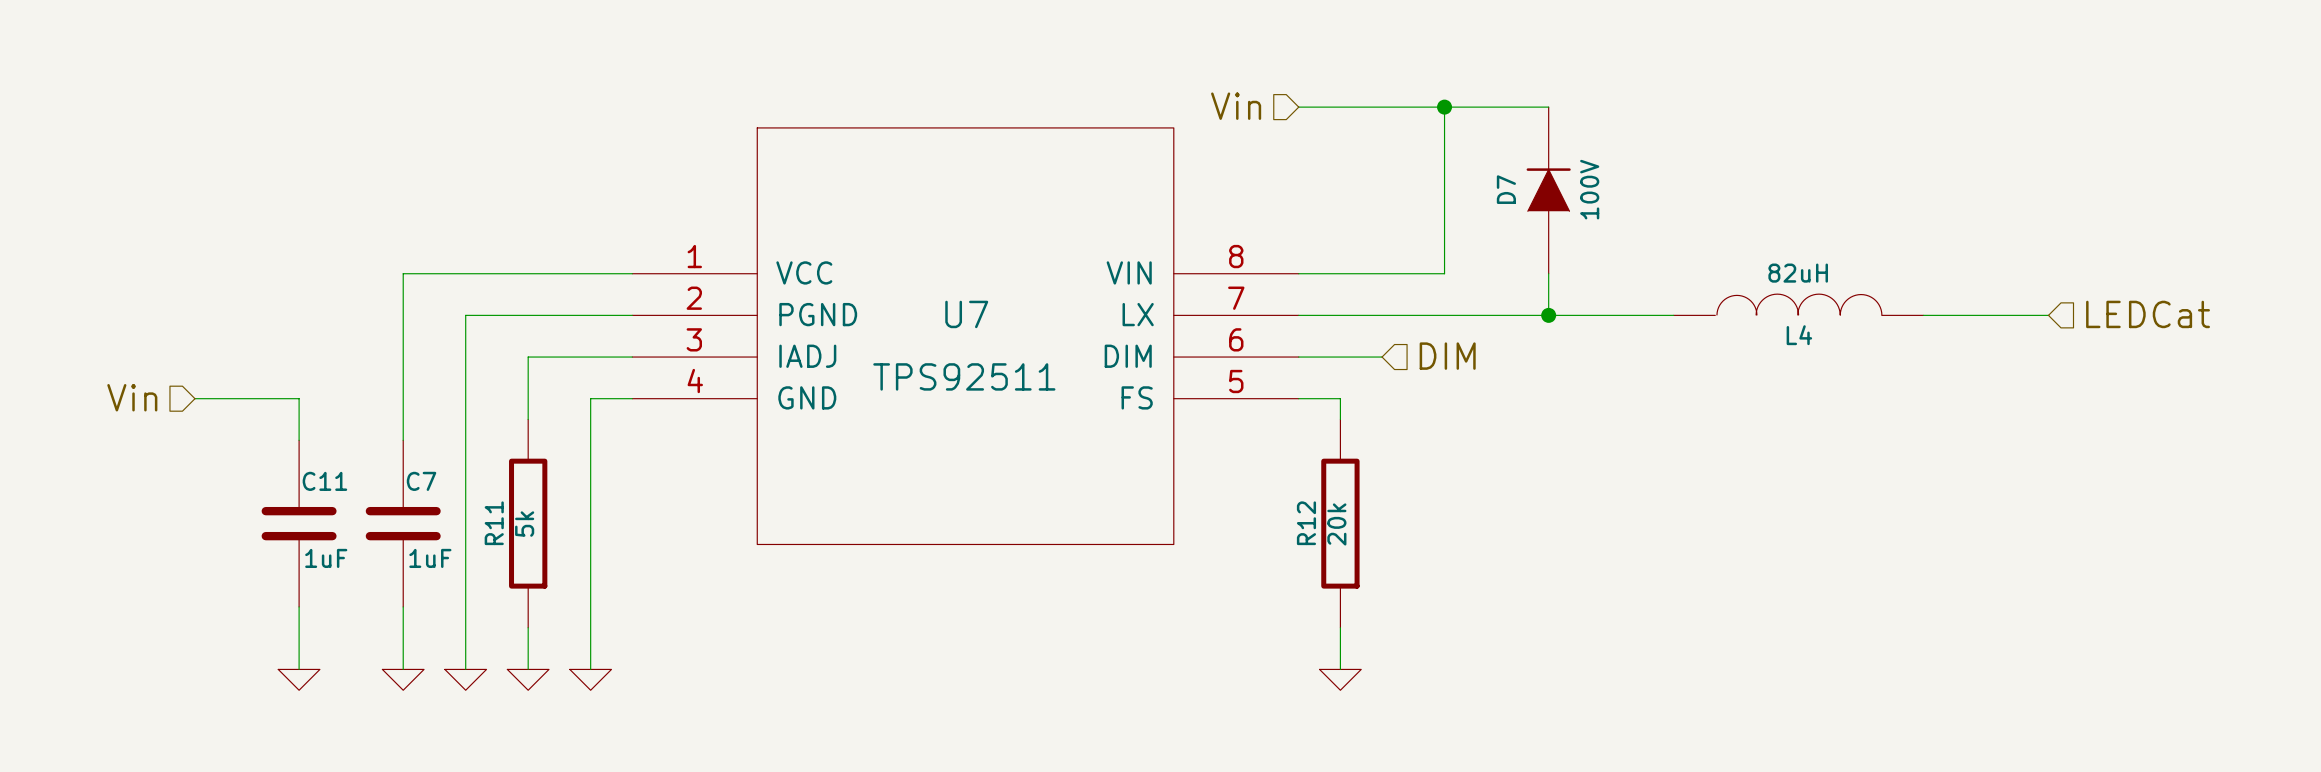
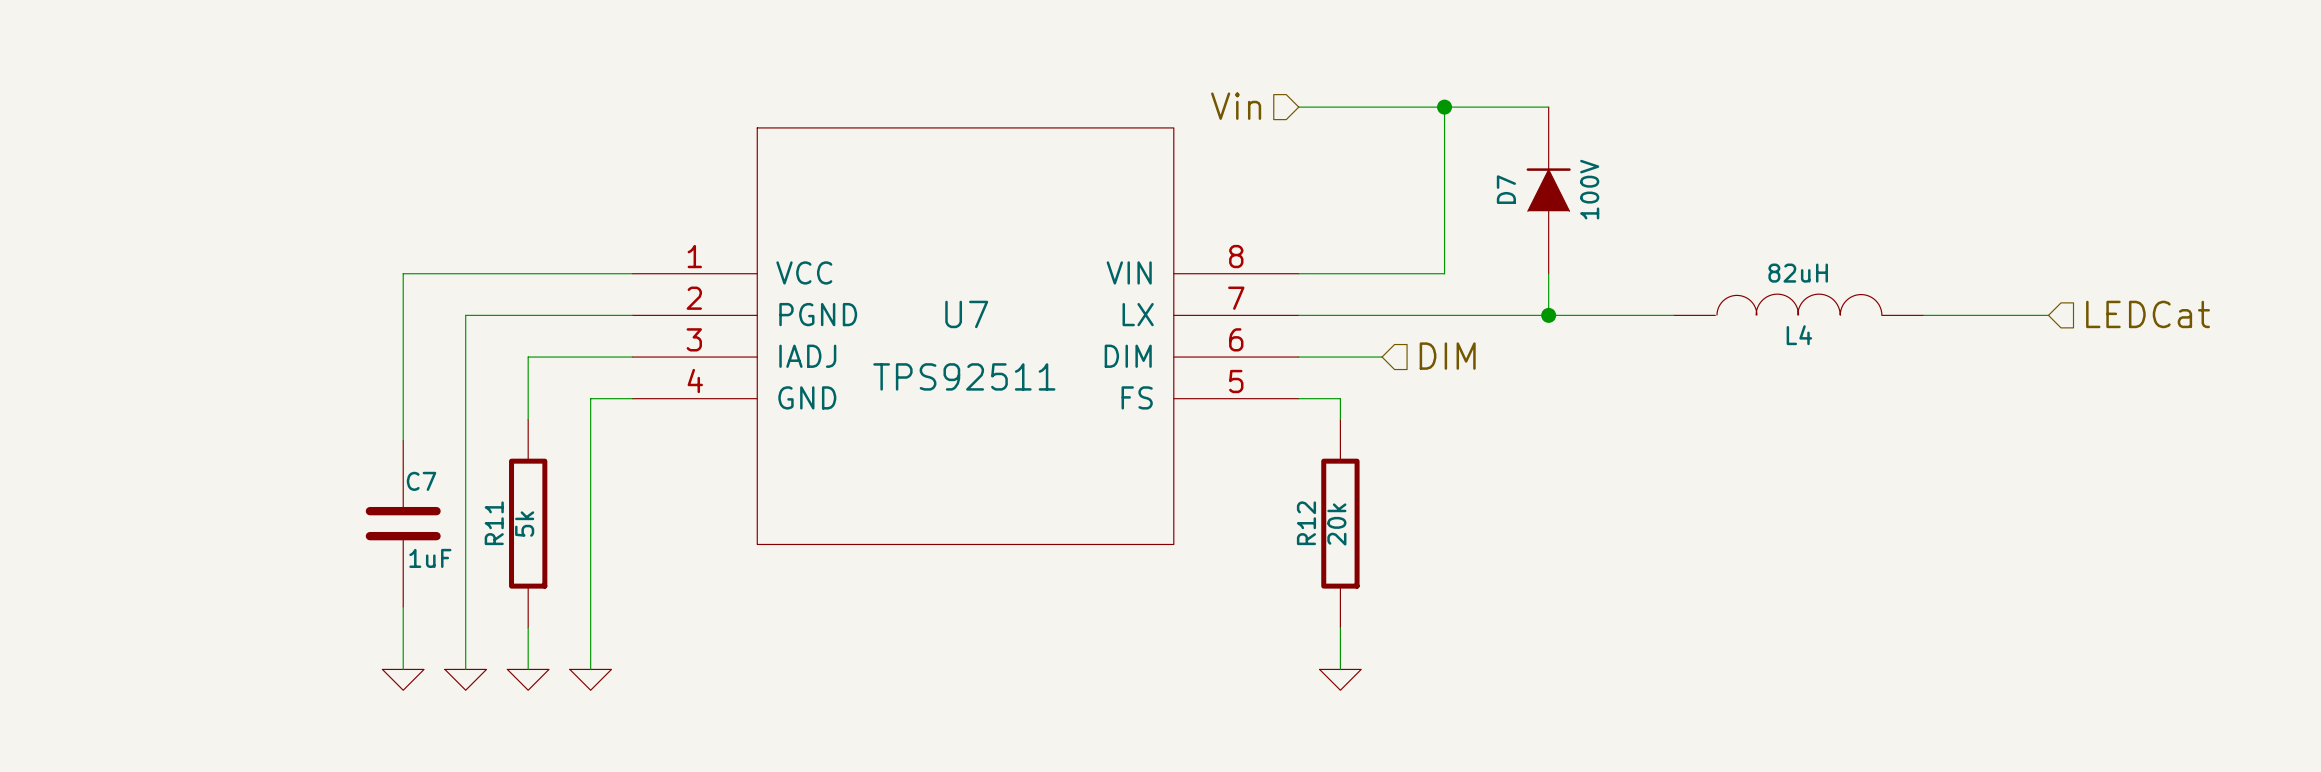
hierarchical label: Vin (132, 397) -> none
wire: (194, 398) (299, 398) (299, 440) -> none
C11: 1uF (299, 523) -> none
wire: (299, 606) (299, 669) -> none
power symbol: (299, 679) -> none

